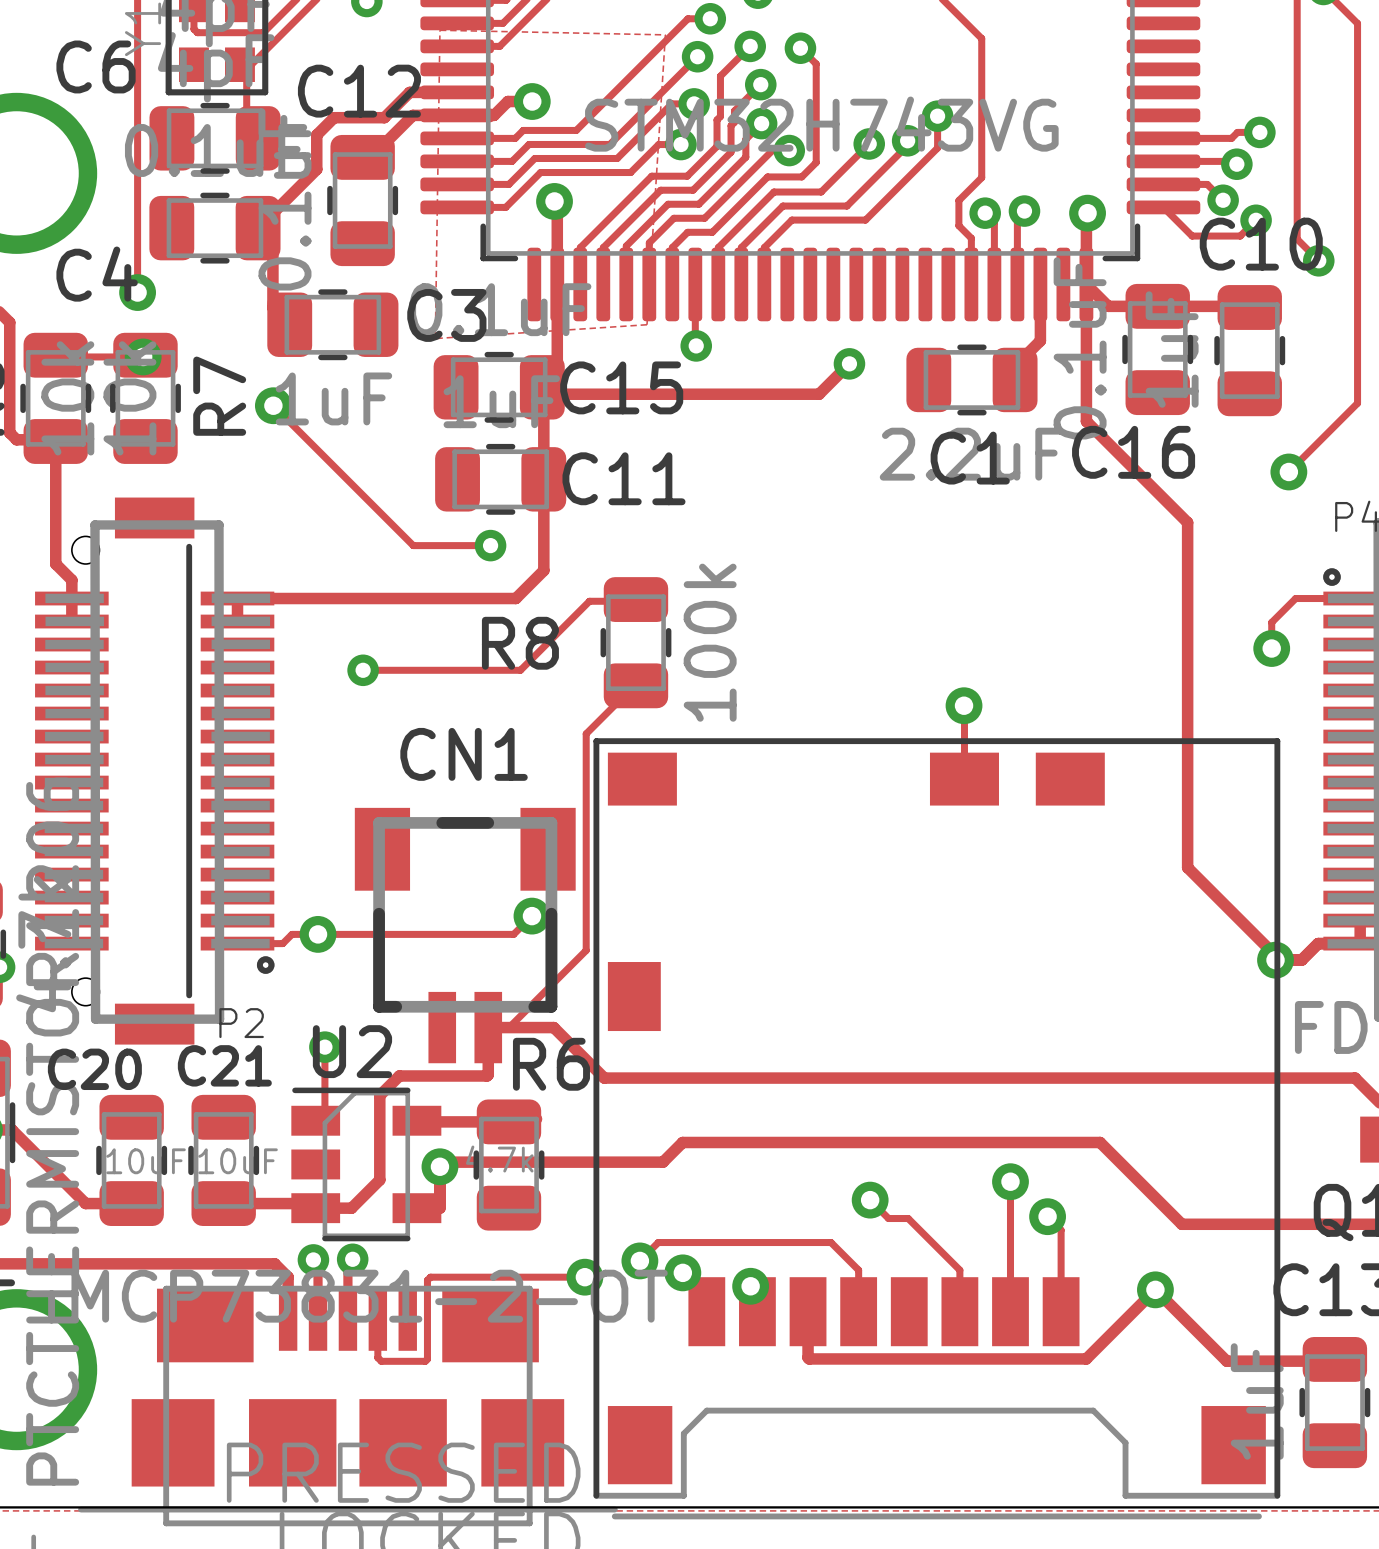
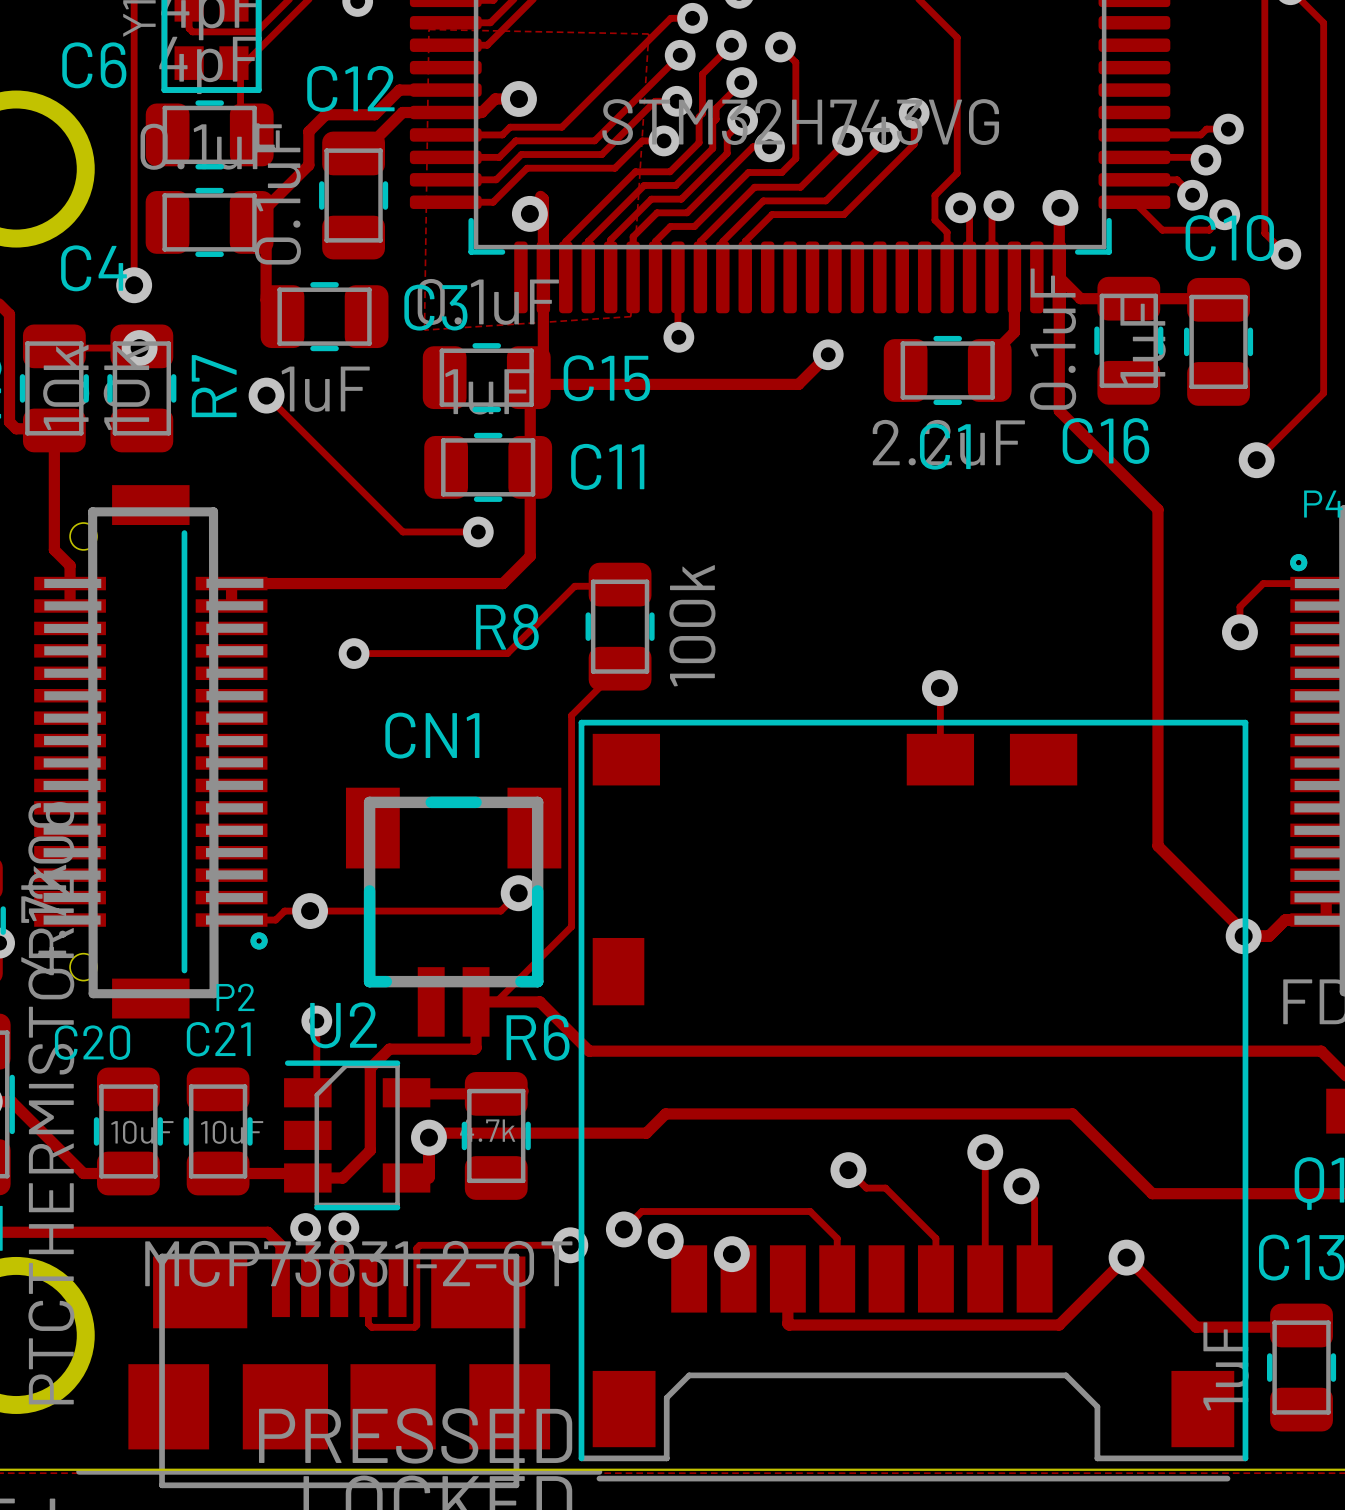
via position: (554, 201) -> (529, 213)

